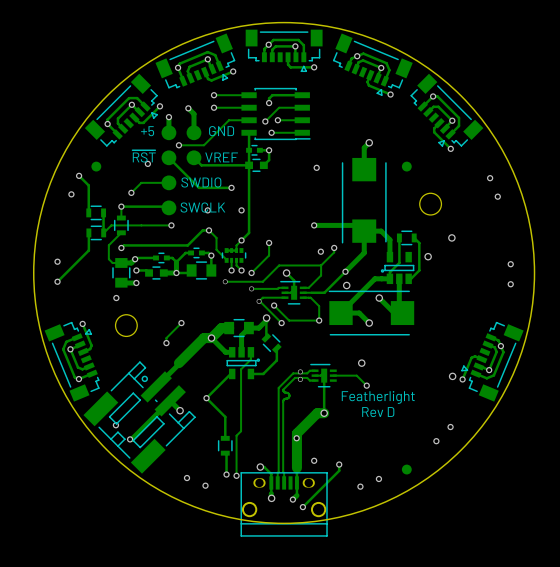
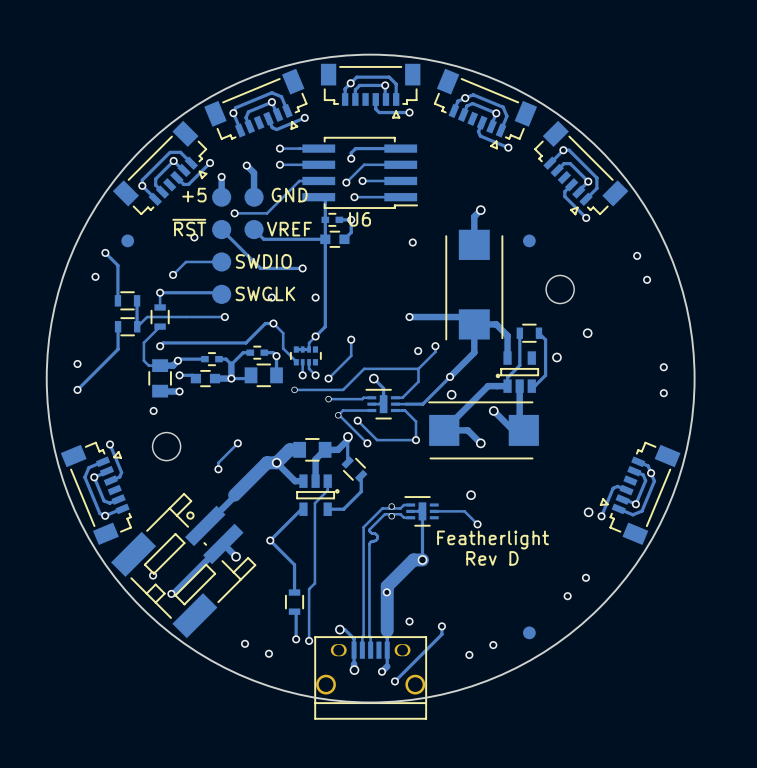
part: (276, 113) -> none
U6: none -> (360, 172)

